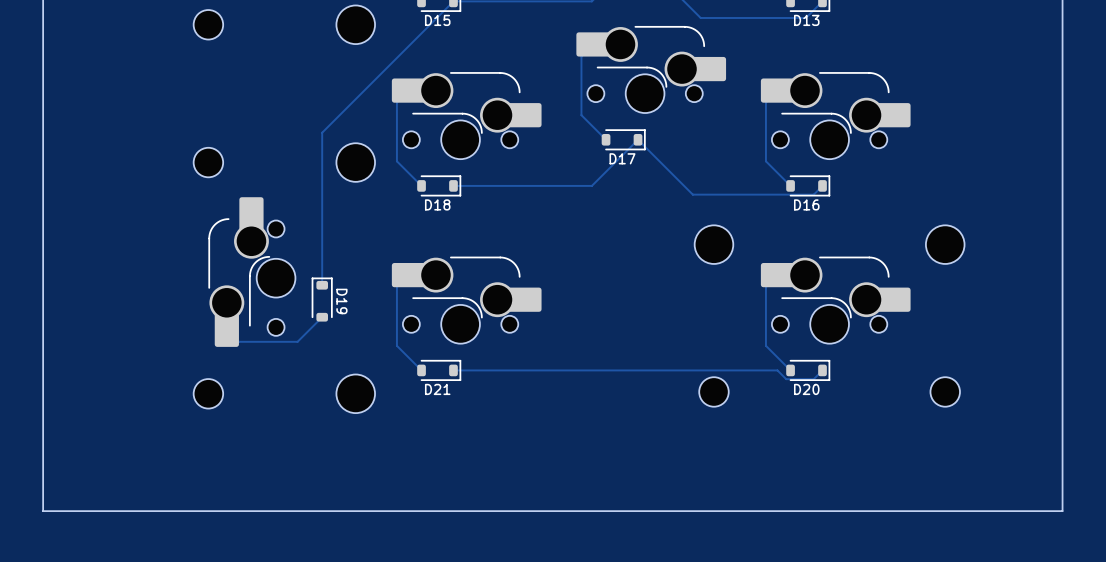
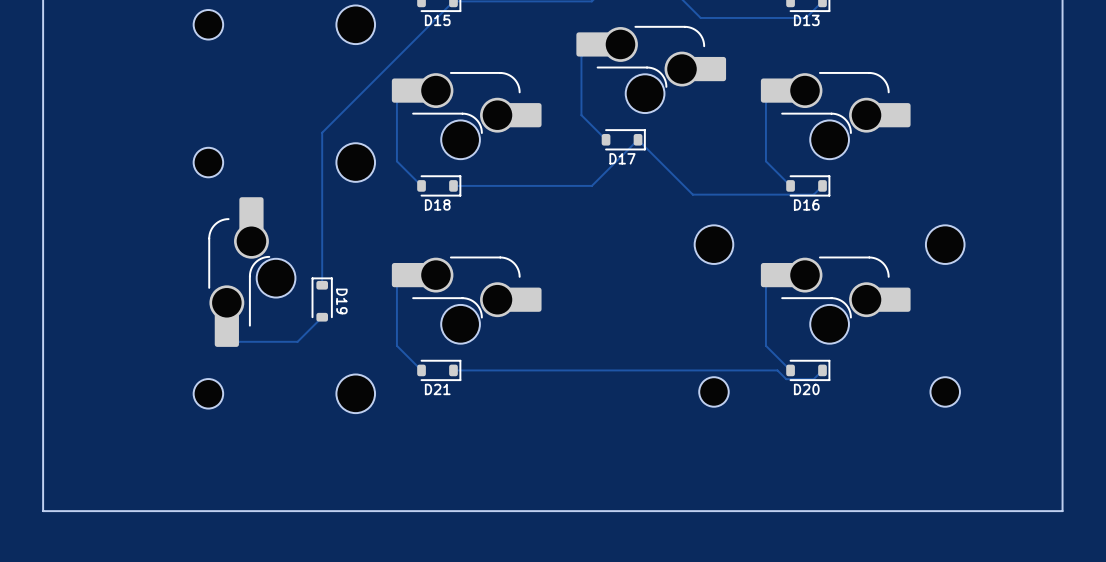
part footprint: [576, 26, 727, 114] -> [576, 26, 727, 114]
part footprint: [391, 72, 542, 160] -> [391, 72, 542, 160]
part footprint: [760, 72, 911, 160] -> [760, 72, 911, 160]
part footprint: [208, 197, 296, 347] -> [208, 197, 296, 347]
part footprint: [391, 256, 542, 344] -> [391, 256, 542, 344]
part footprint: [760, 256, 911, 344] -> [760, 256, 911, 344]

